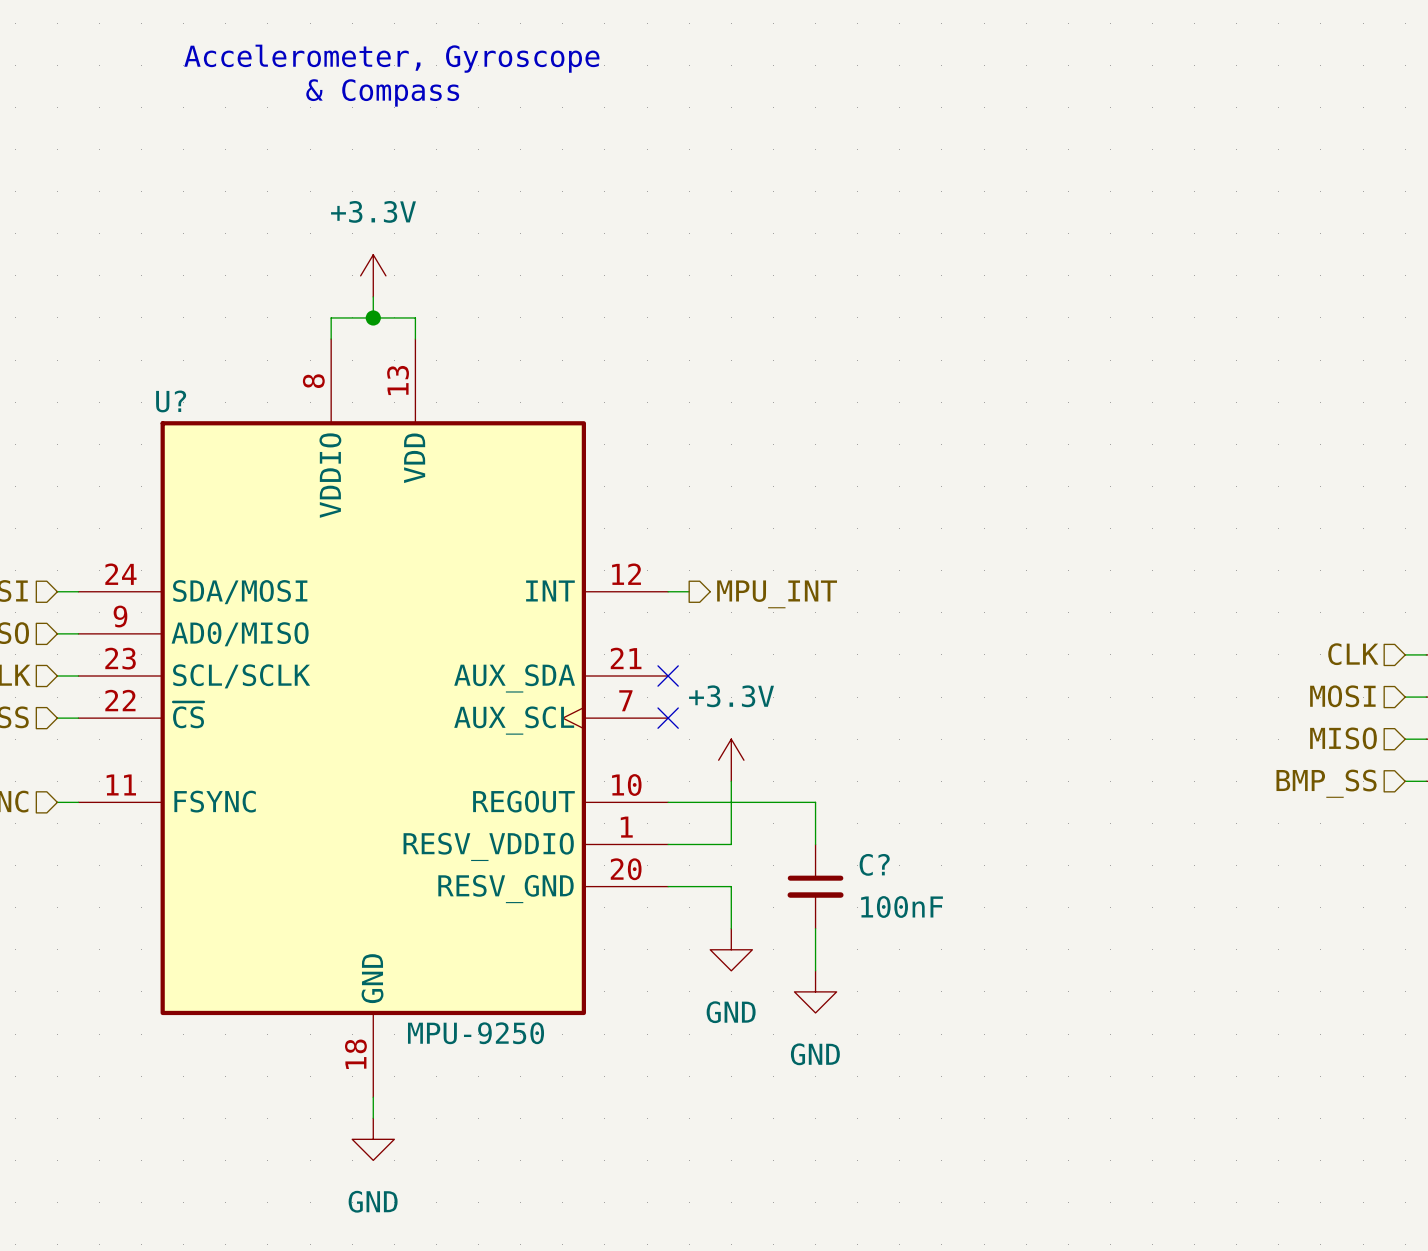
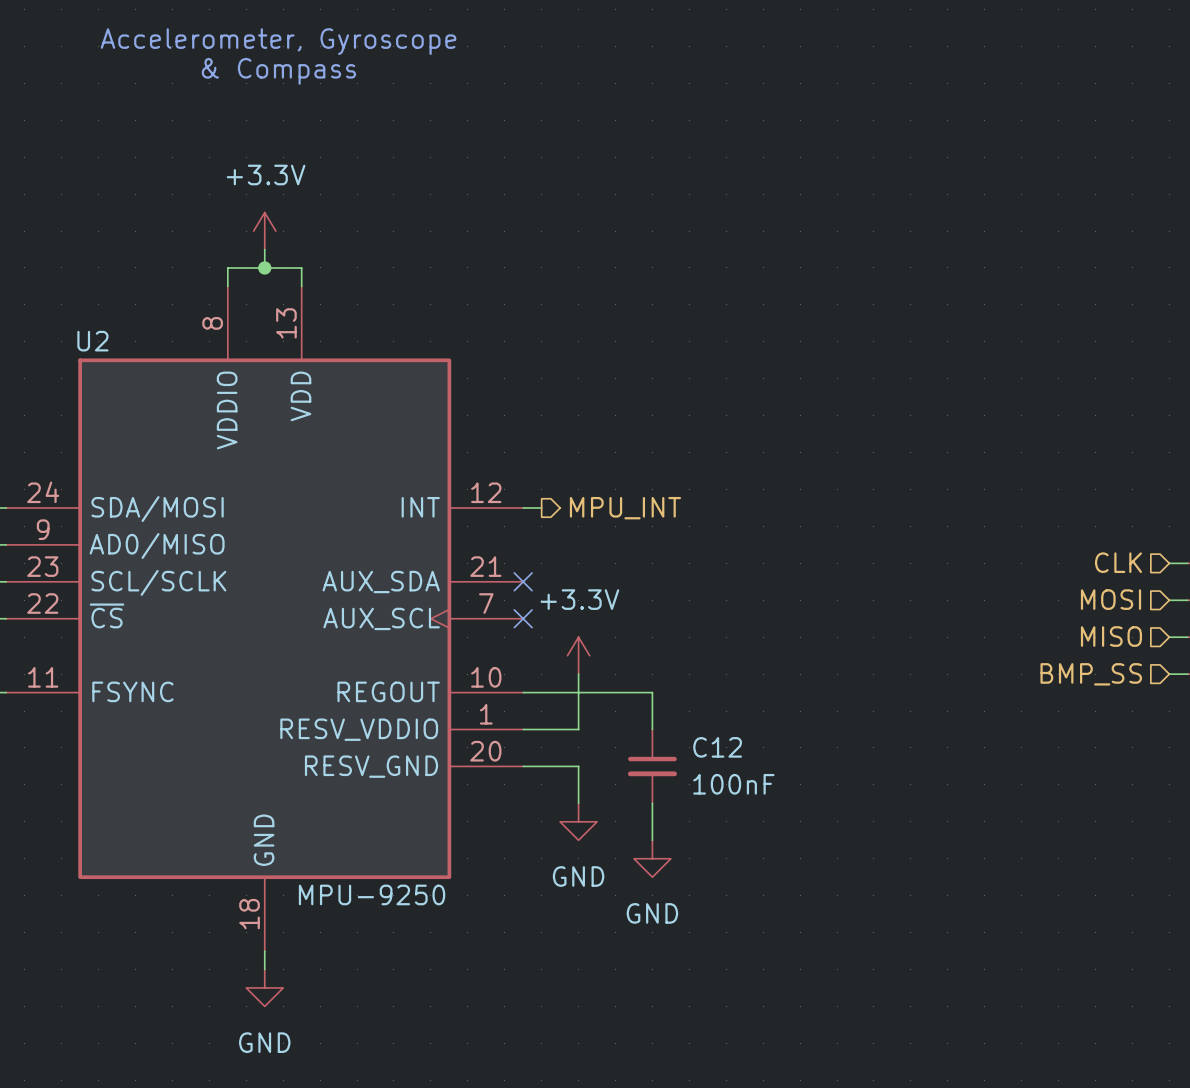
U? name: U? (171, 401) -> U2 (92, 341)
C? name: C? (874, 864) -> C12 (717, 747)

